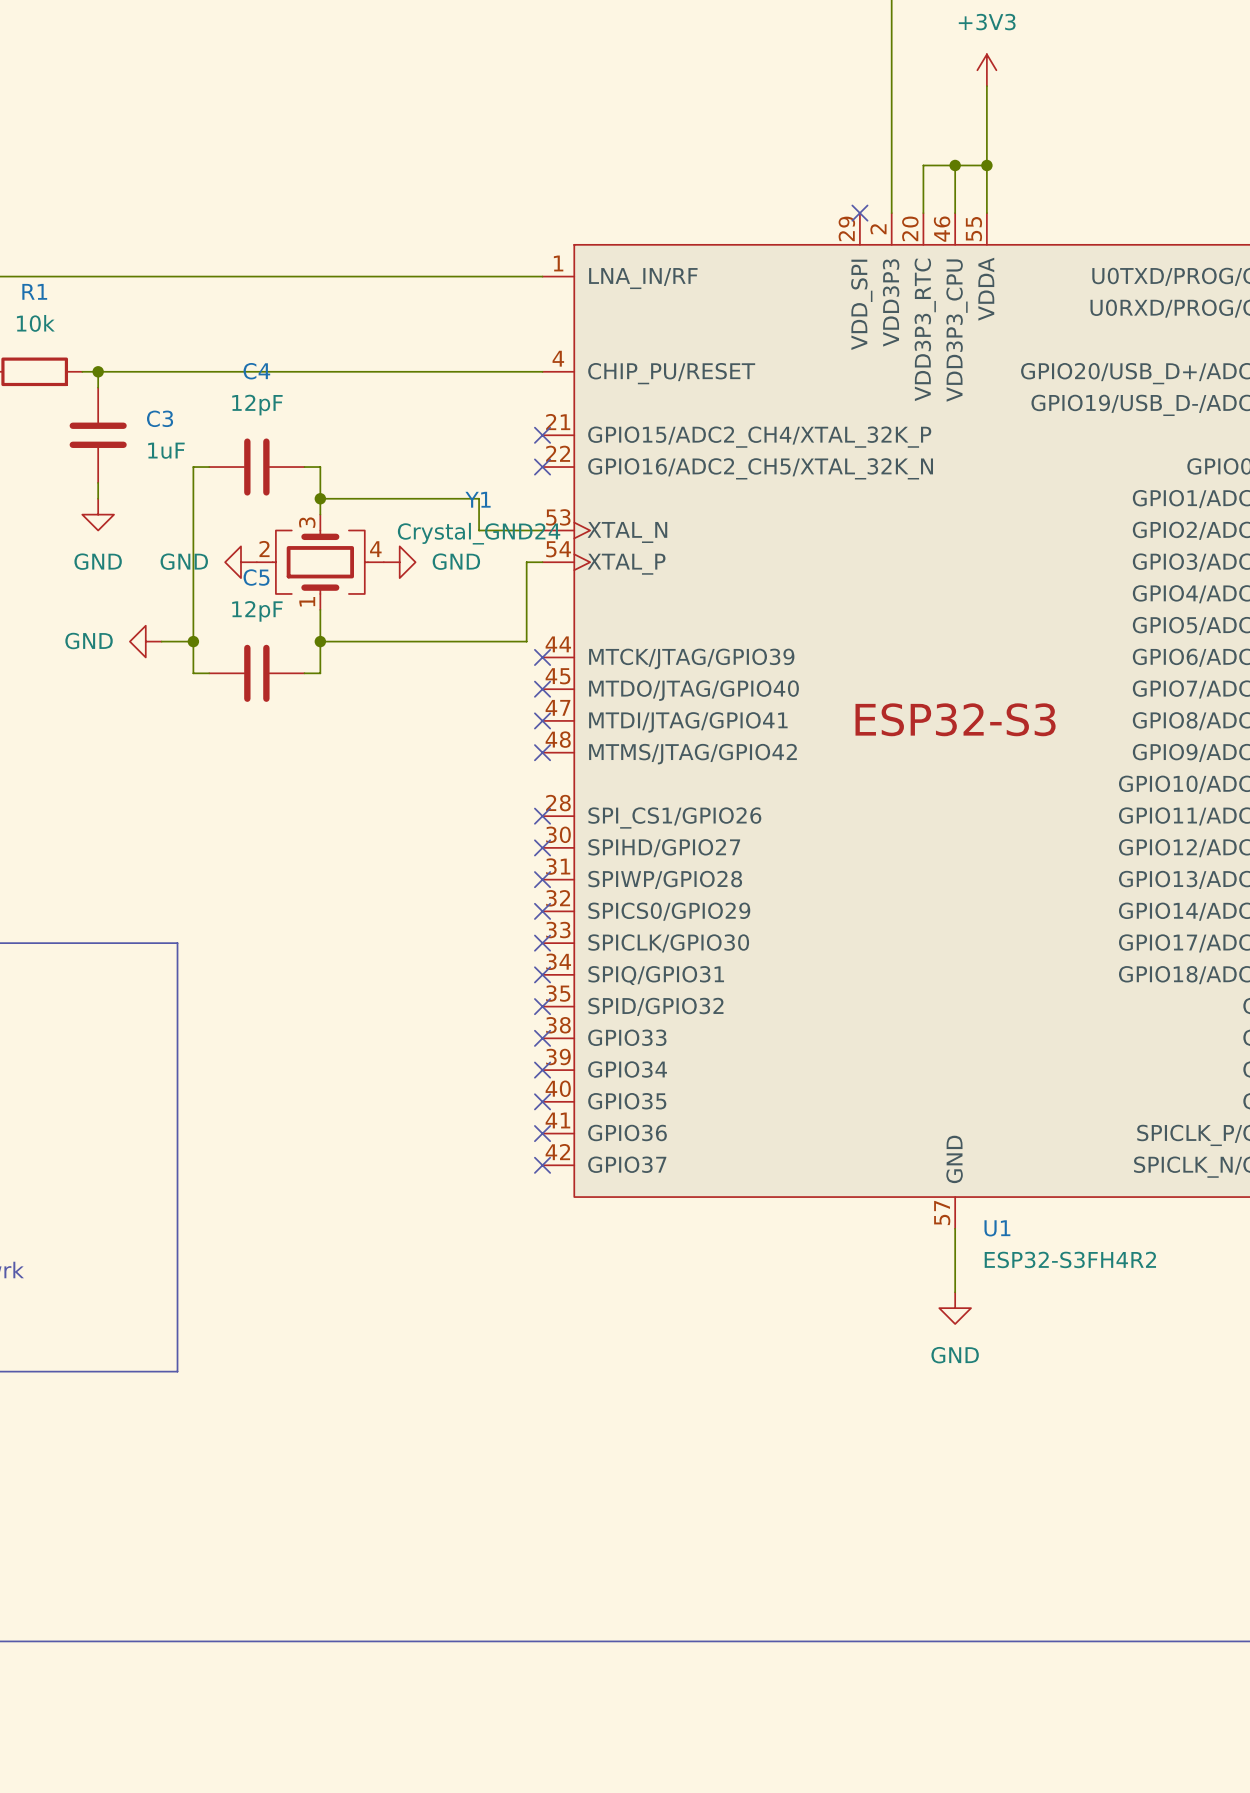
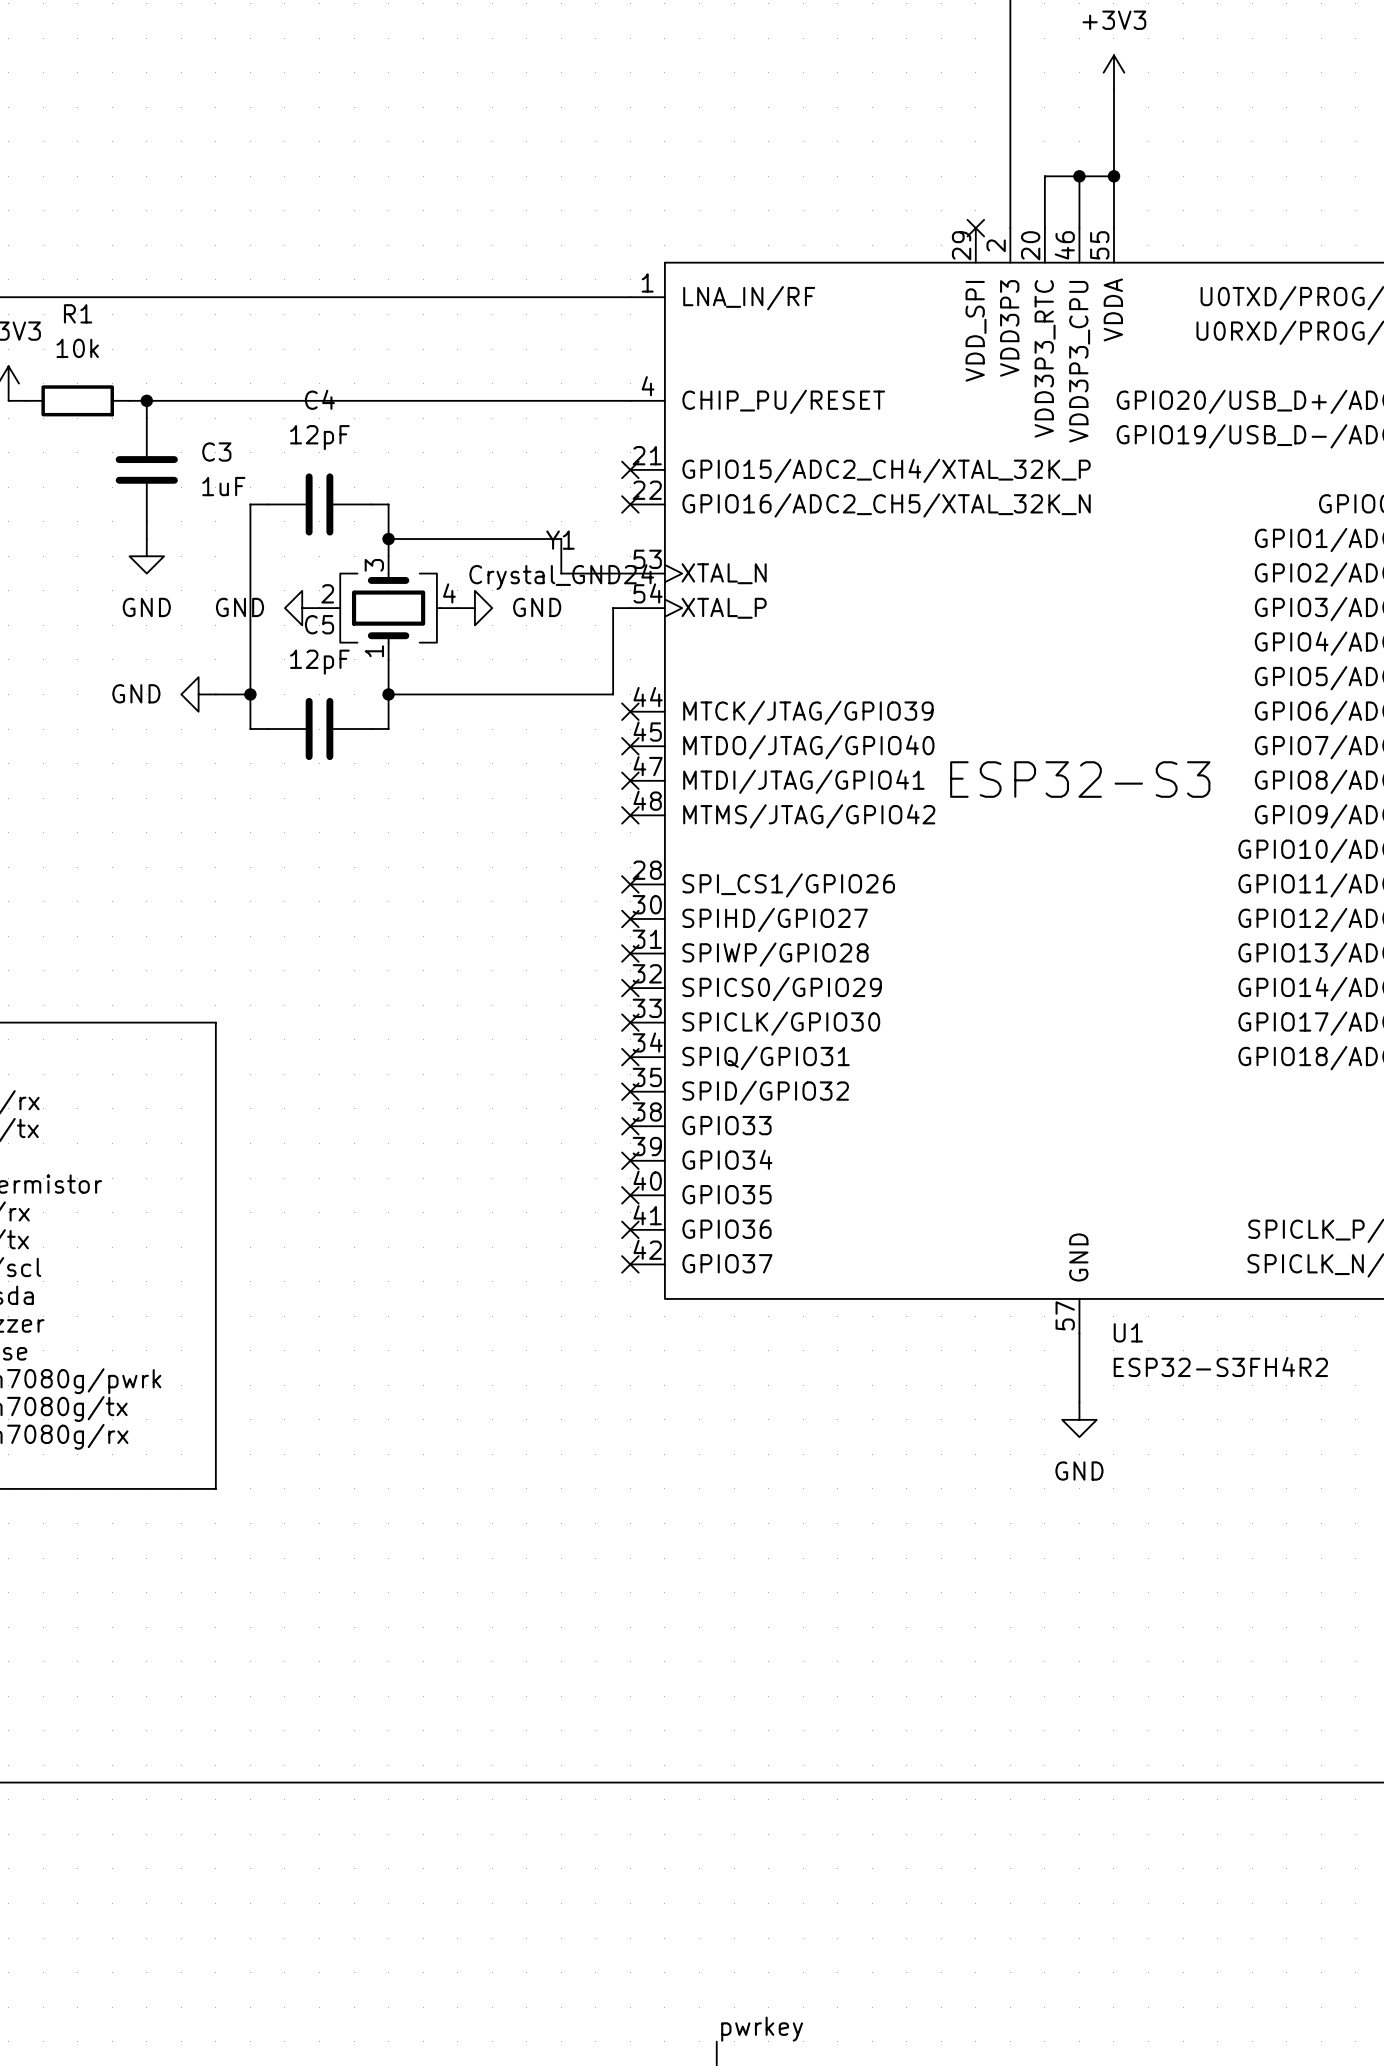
line: (161, 943) (177, 943) (177, 1371) (161, 1371) -> (215, 1022) (215, 1488)

